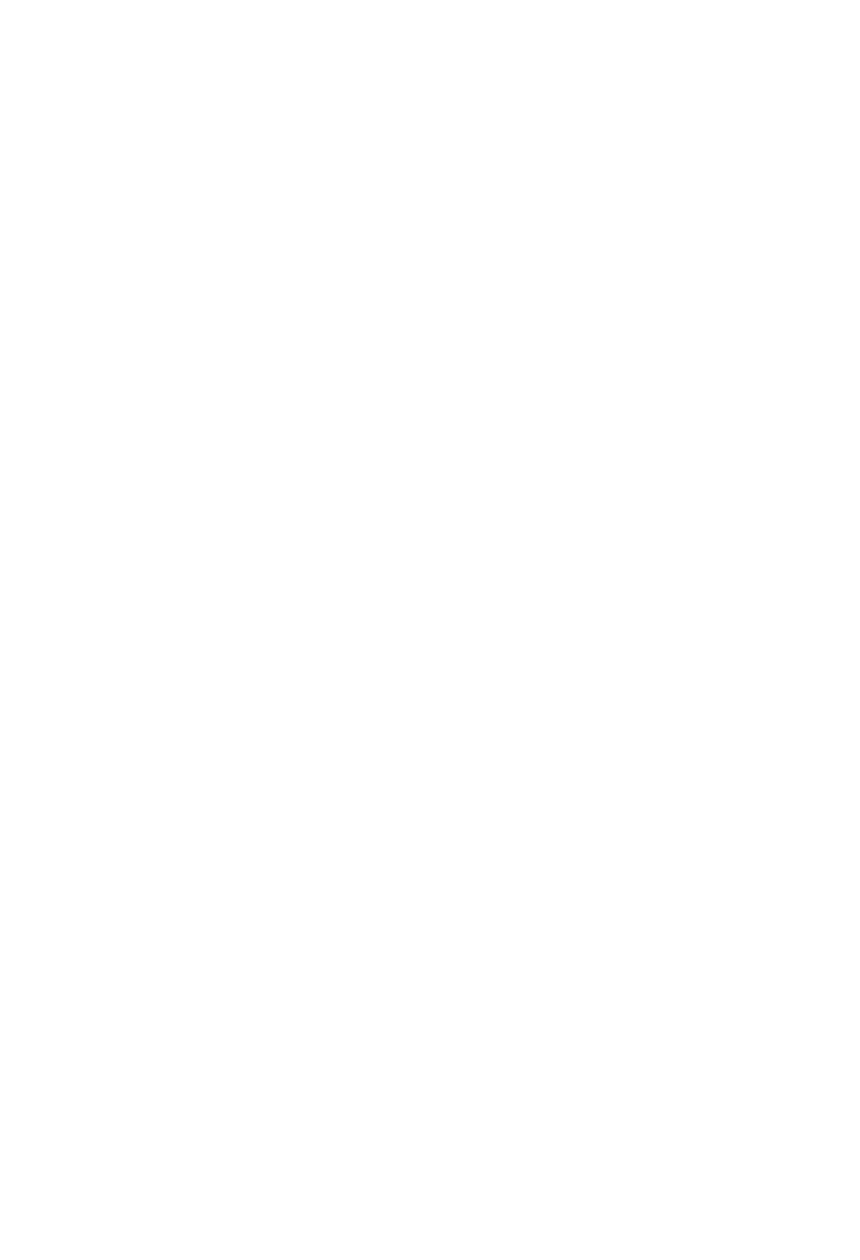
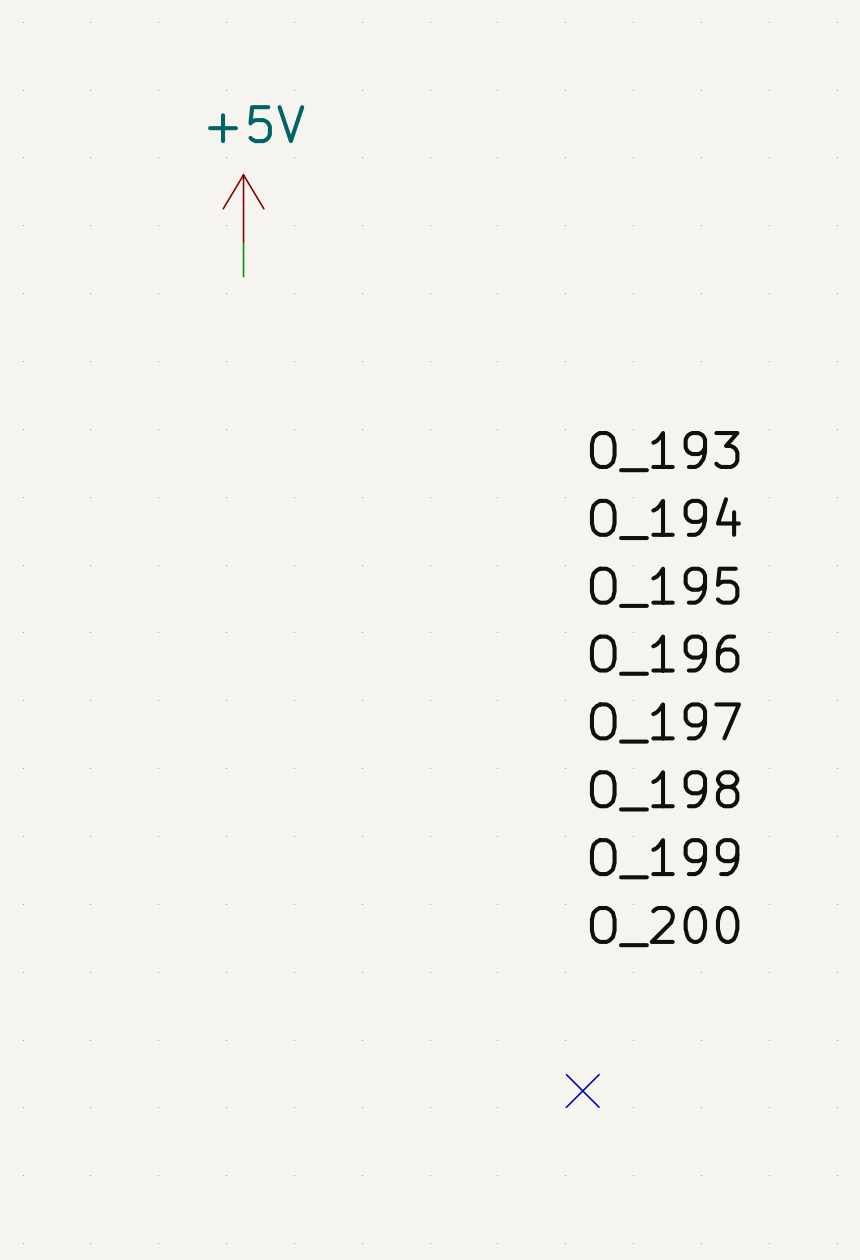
power symbol: none -> +5V (243, 208)
wire: none -> (243, 242) (243, 276)
label: none -> O_193 (664, 451)
label: none -> O_194 (665, 518)
label: none -> O_195 (664, 587)
label: none -> O_196 (664, 655)
label: none -> O_197 (665, 723)
label: none -> O_198 (664, 790)
label: none -> O_199 (664, 858)
label: none -> O_200 (664, 926)
no-connect mark: none -> (582, 1090)

